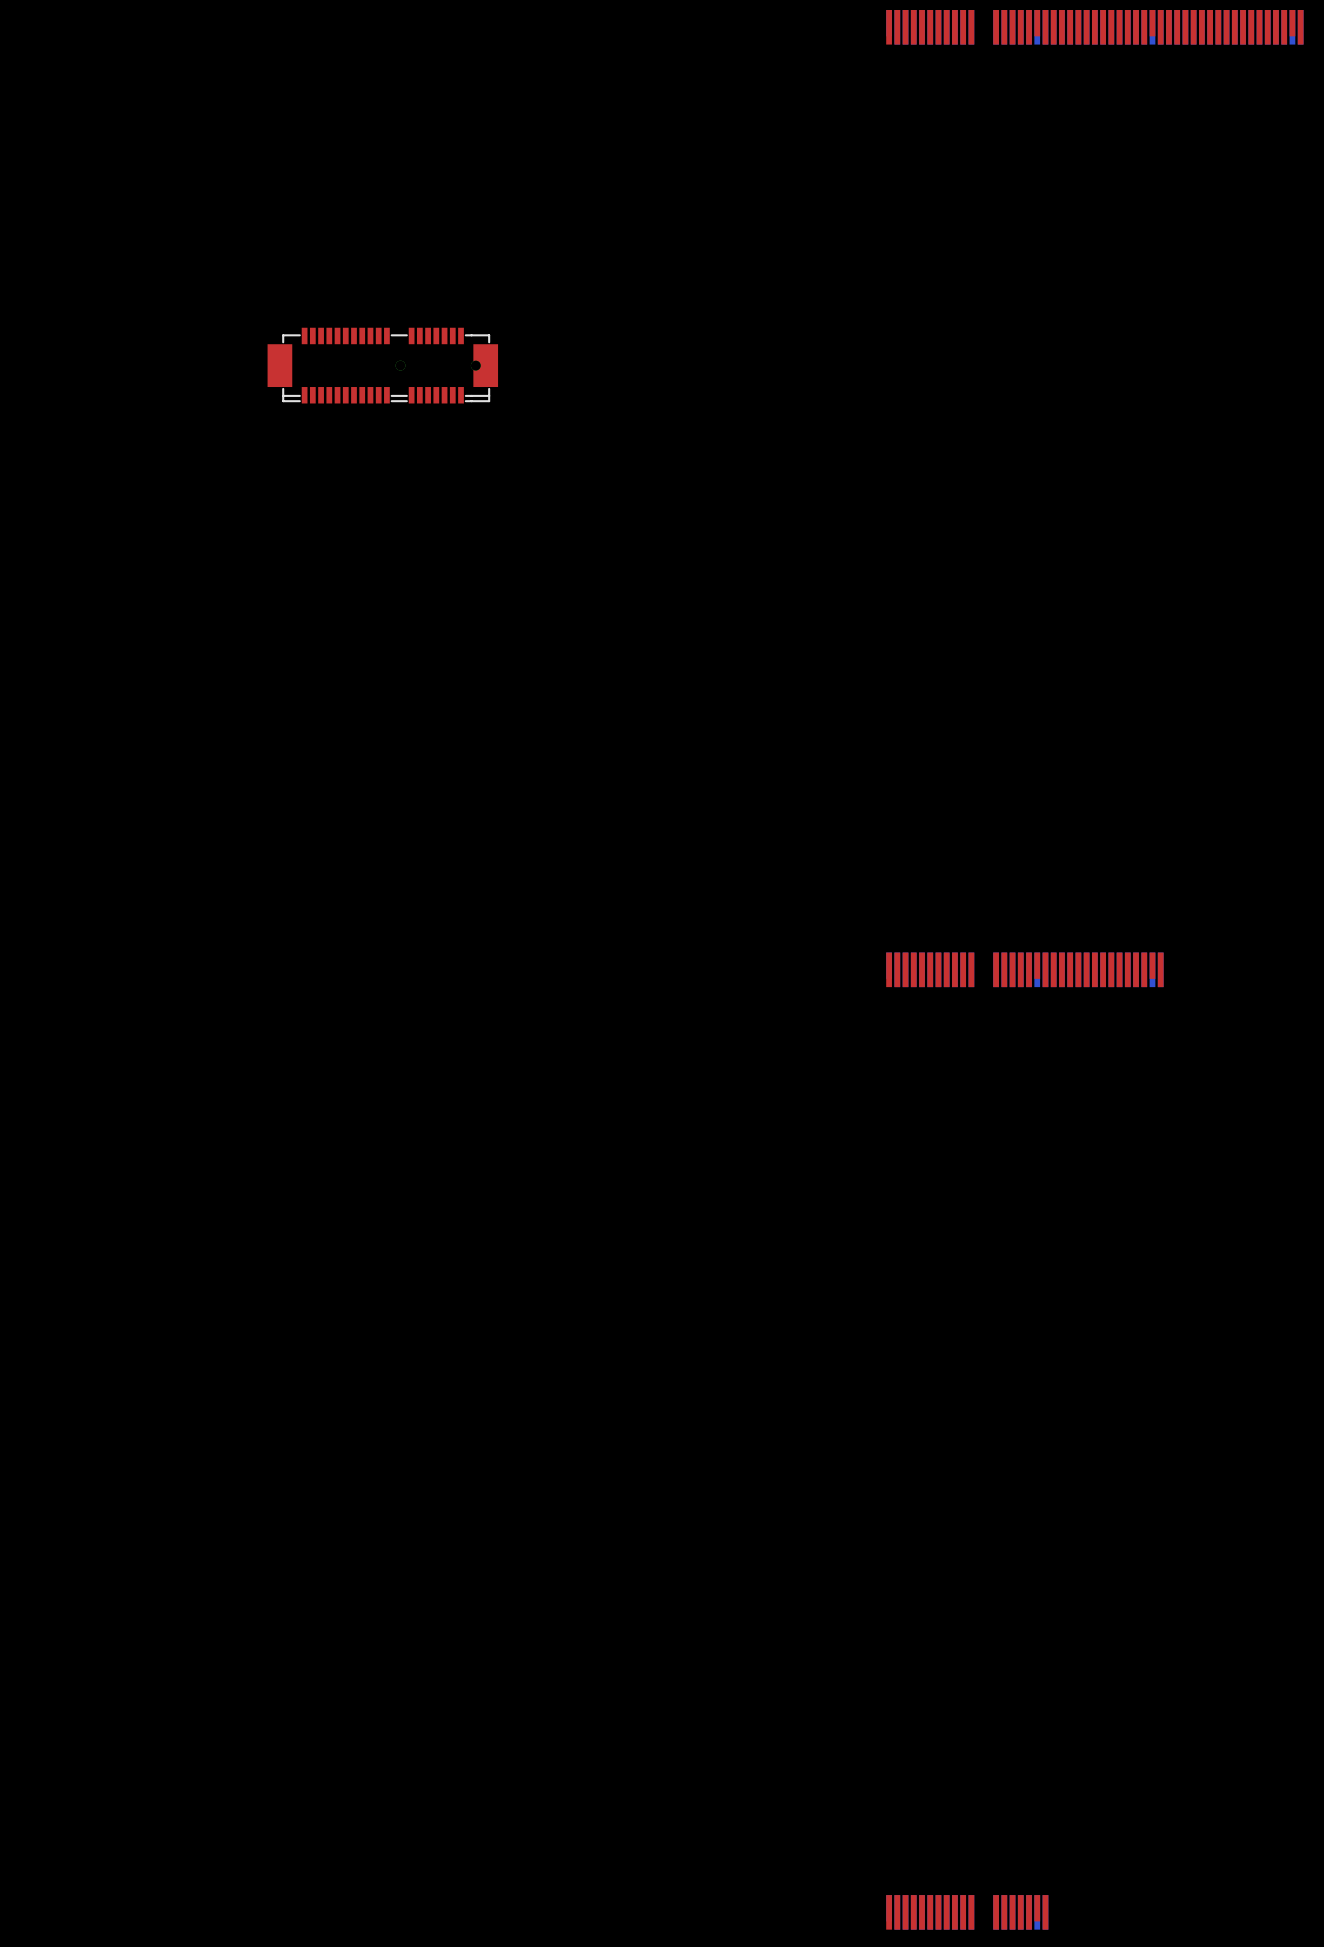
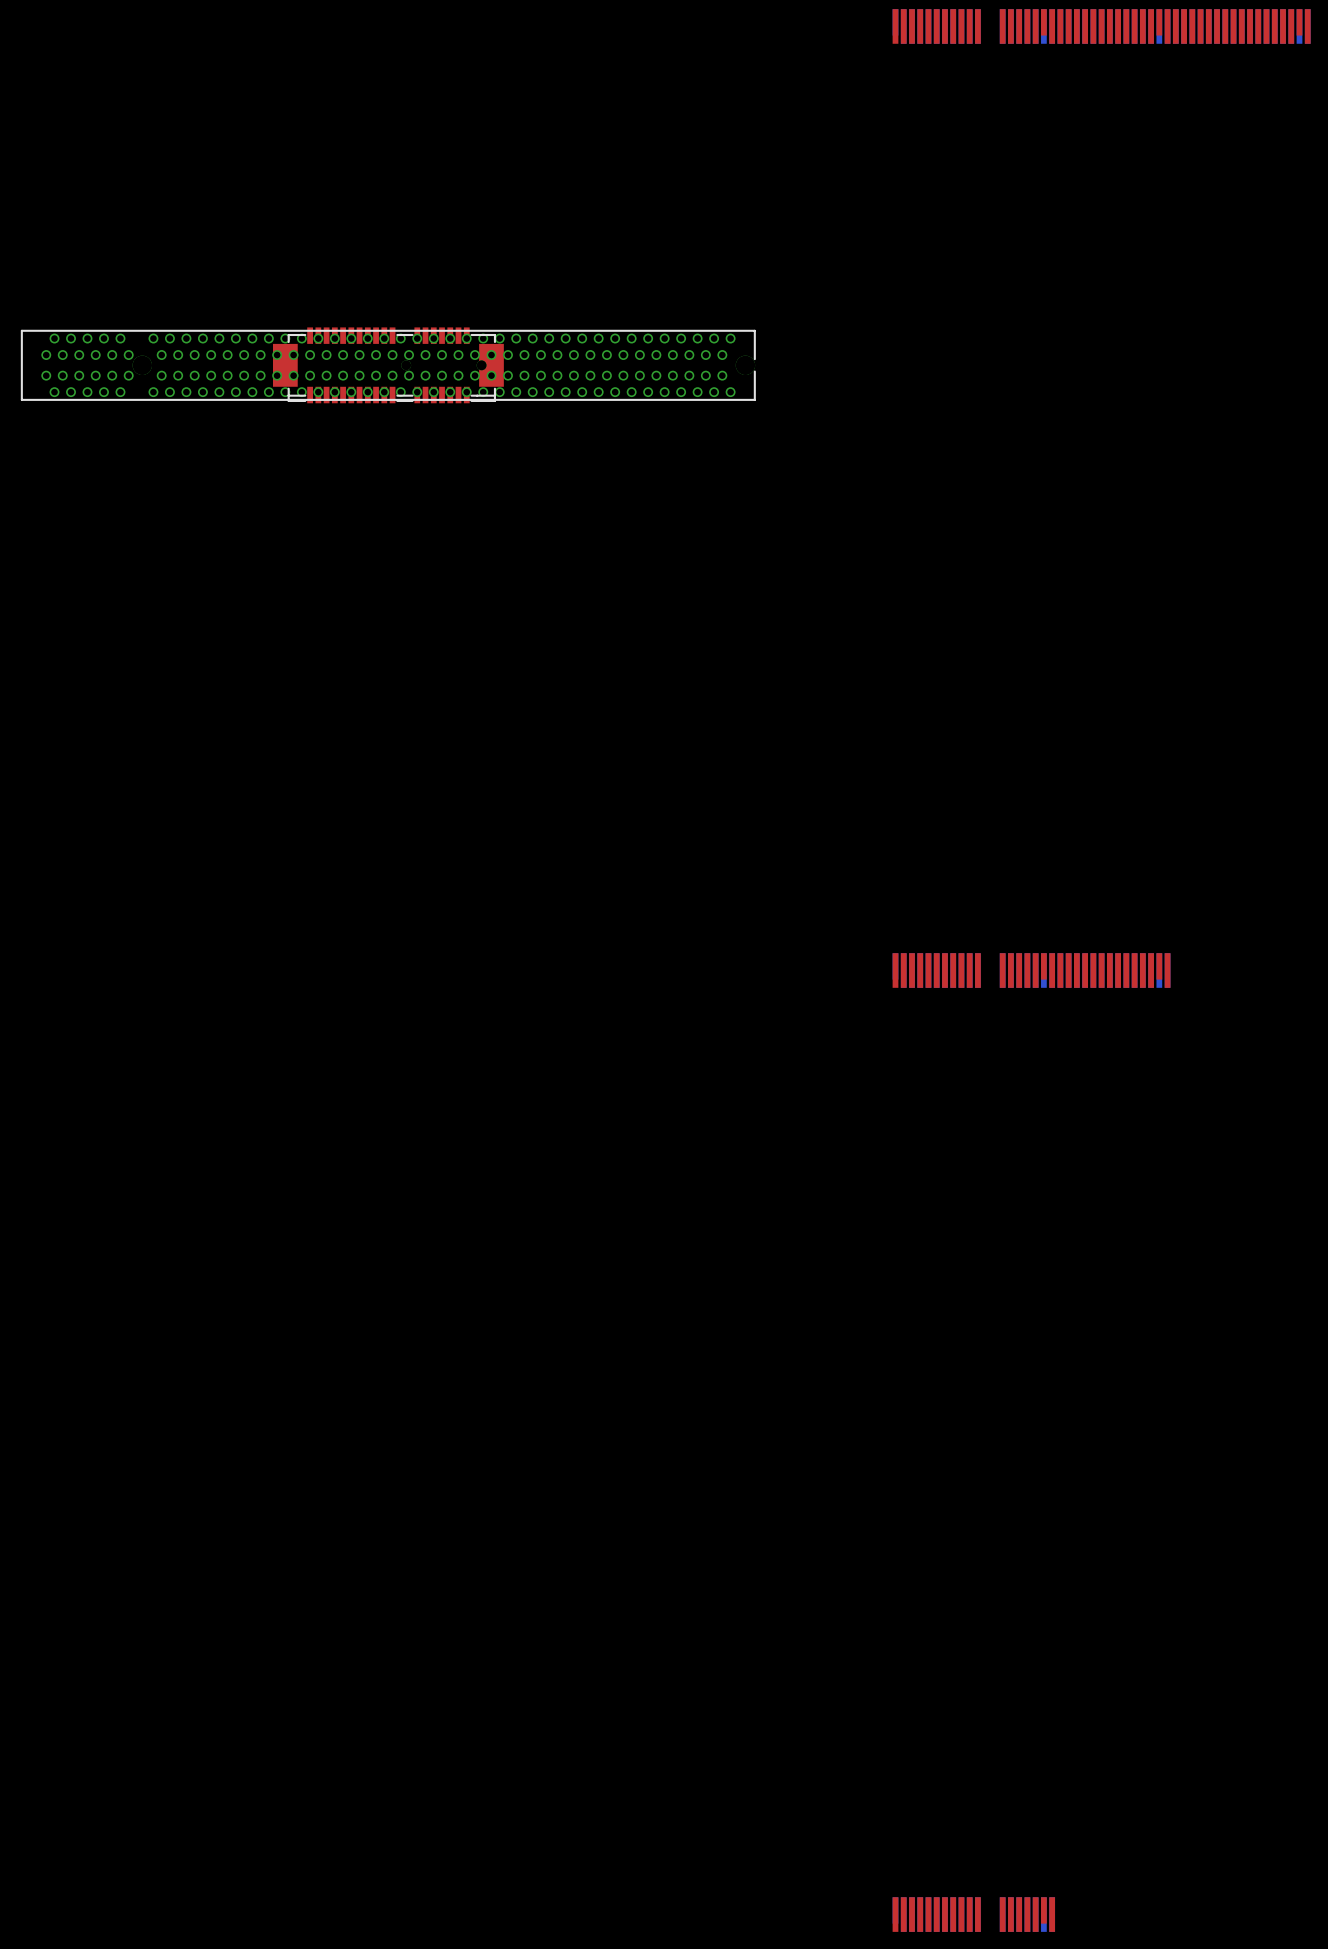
part: none -> (388, 365)

